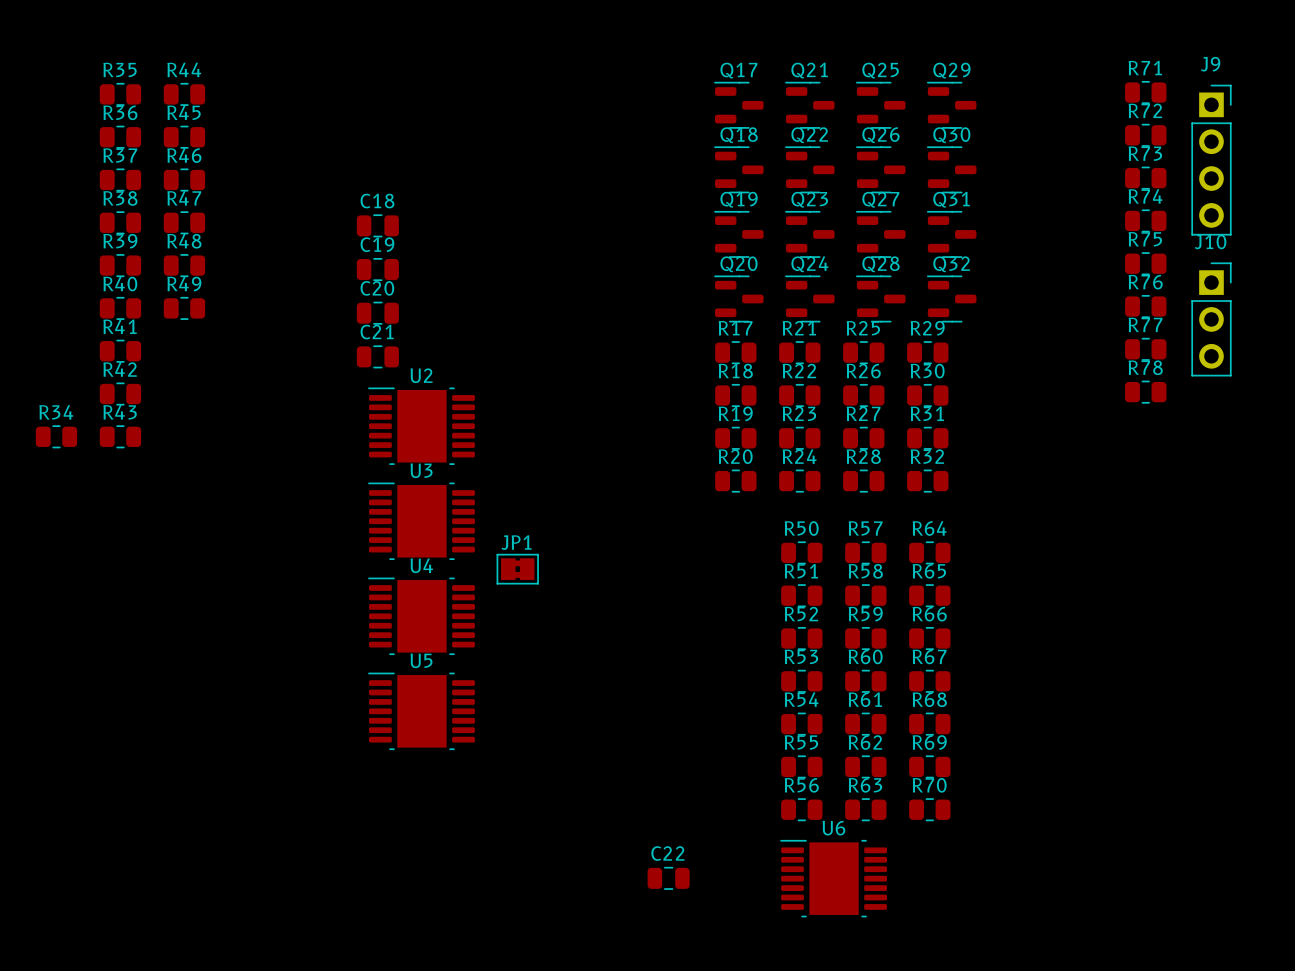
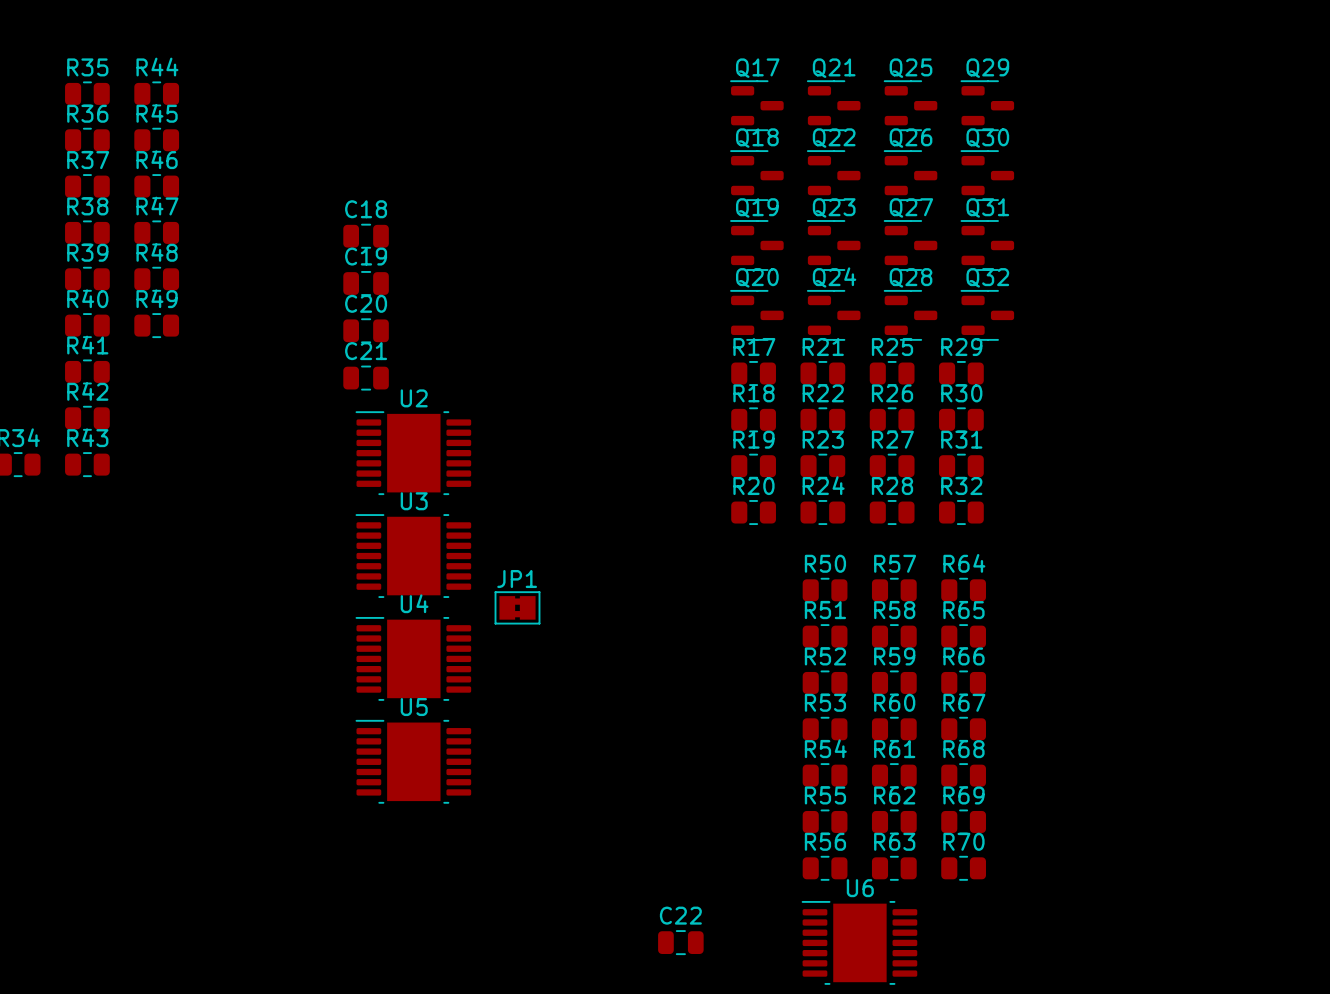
R71: (1145, 92) -> none
R72: (1145, 135) -> none
J9: (1211, 160) -> none
R73: (1145, 178) -> none
R74: (1145, 220) -> none
R75: (1145, 263) -> none
R76: (1145, 306) -> none
J10: (1211, 319) -> none
R77: (1145, 349) -> none
R78: (1145, 392) -> none

